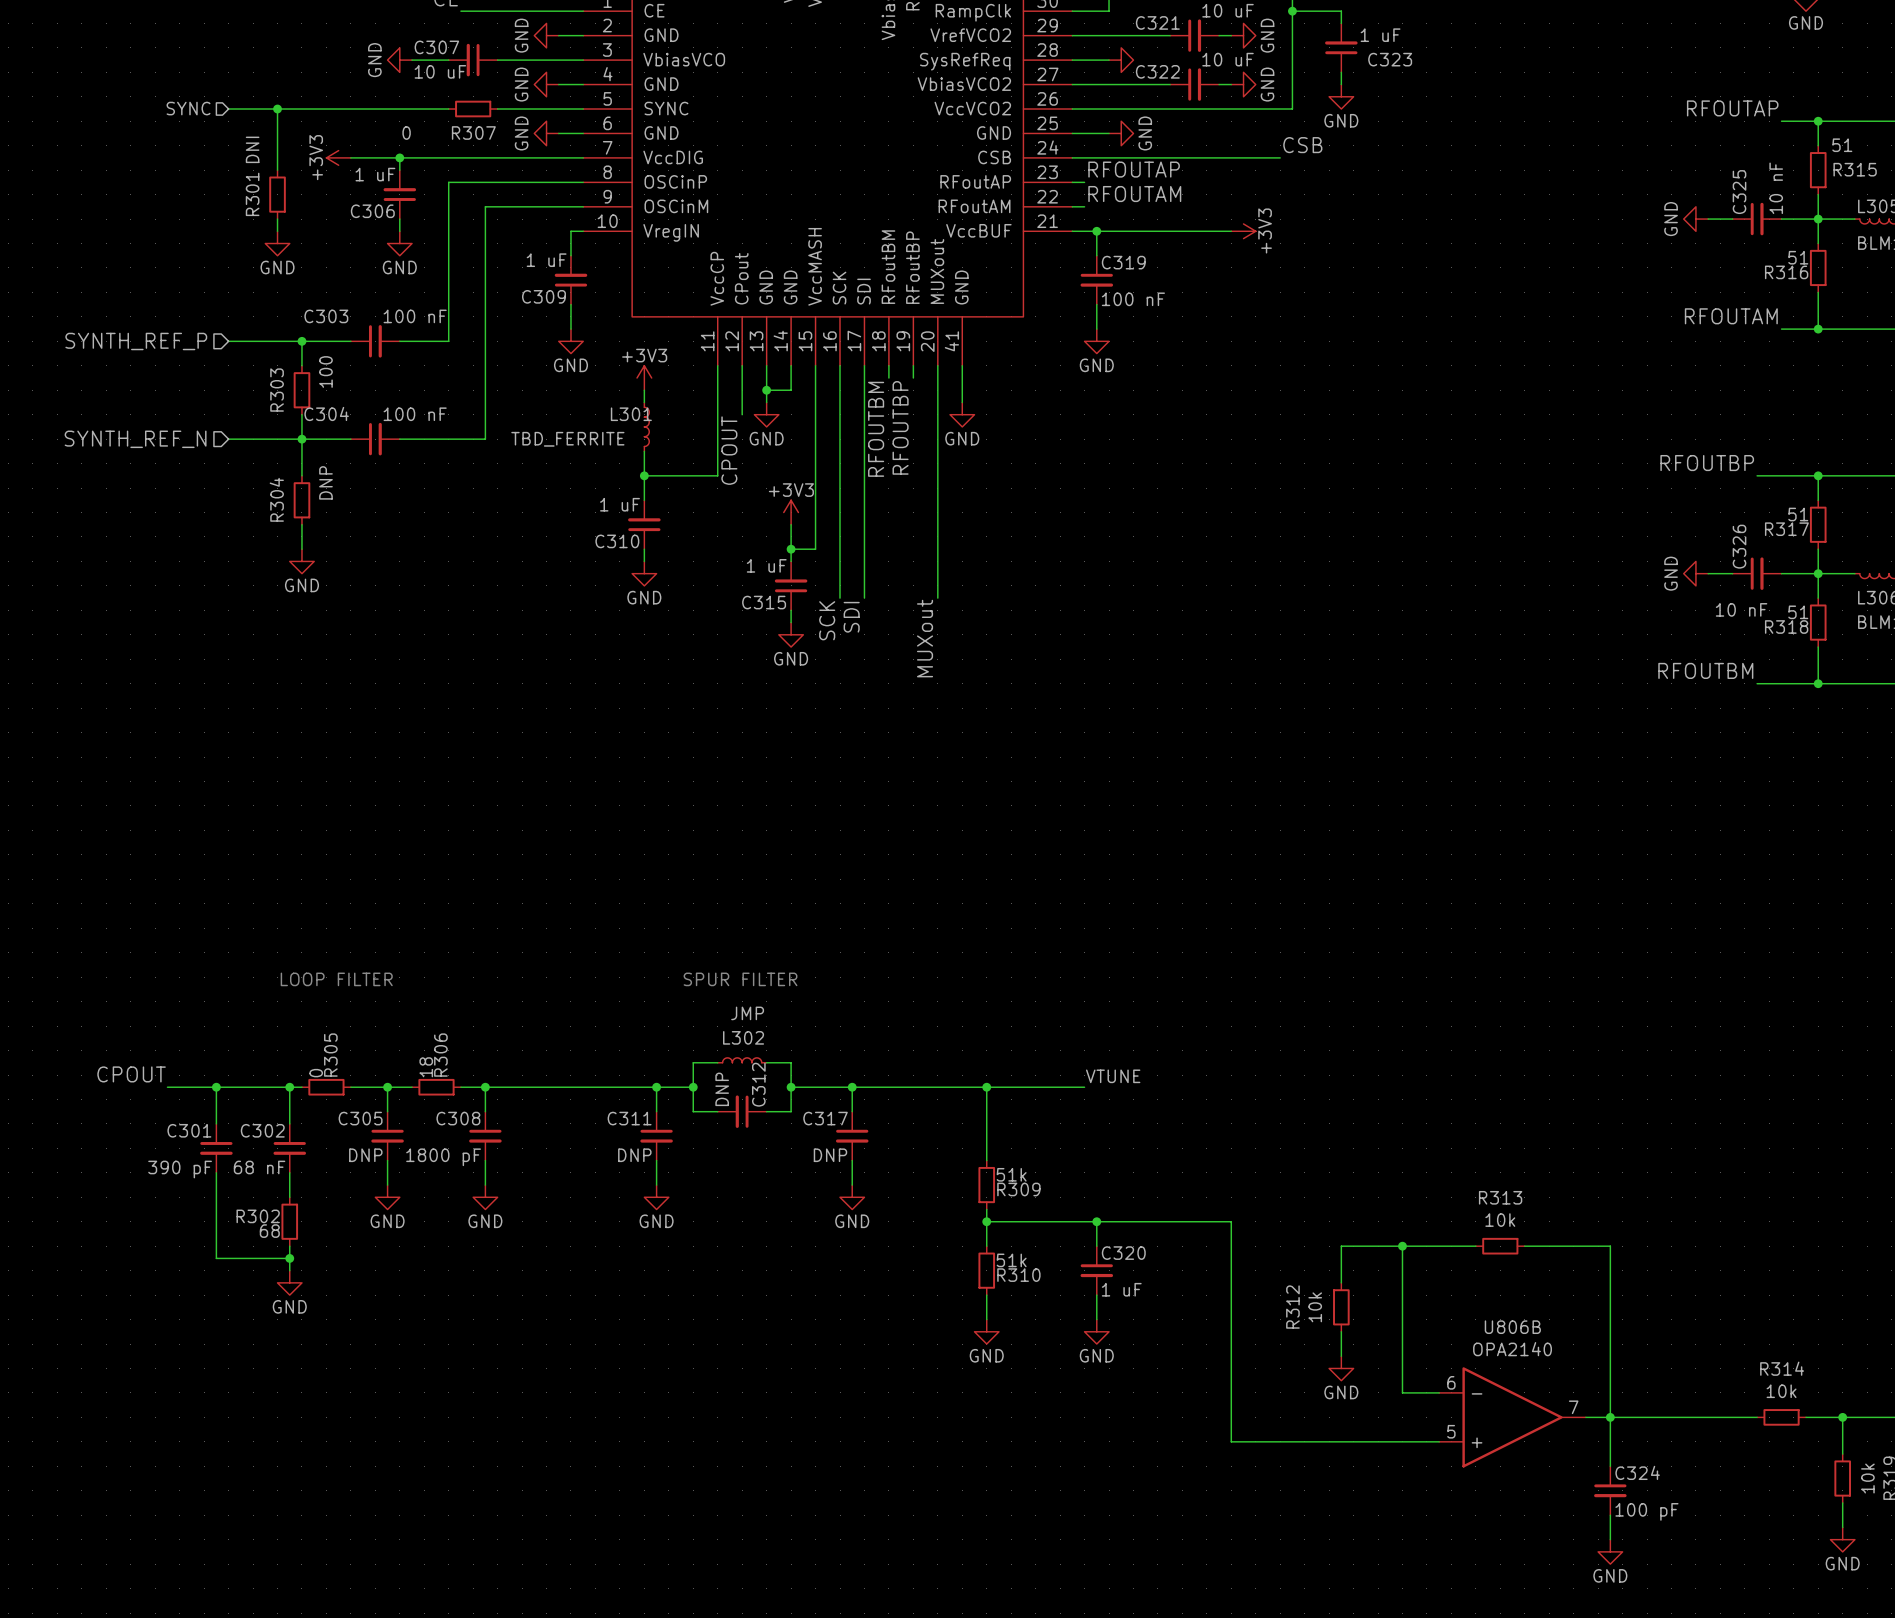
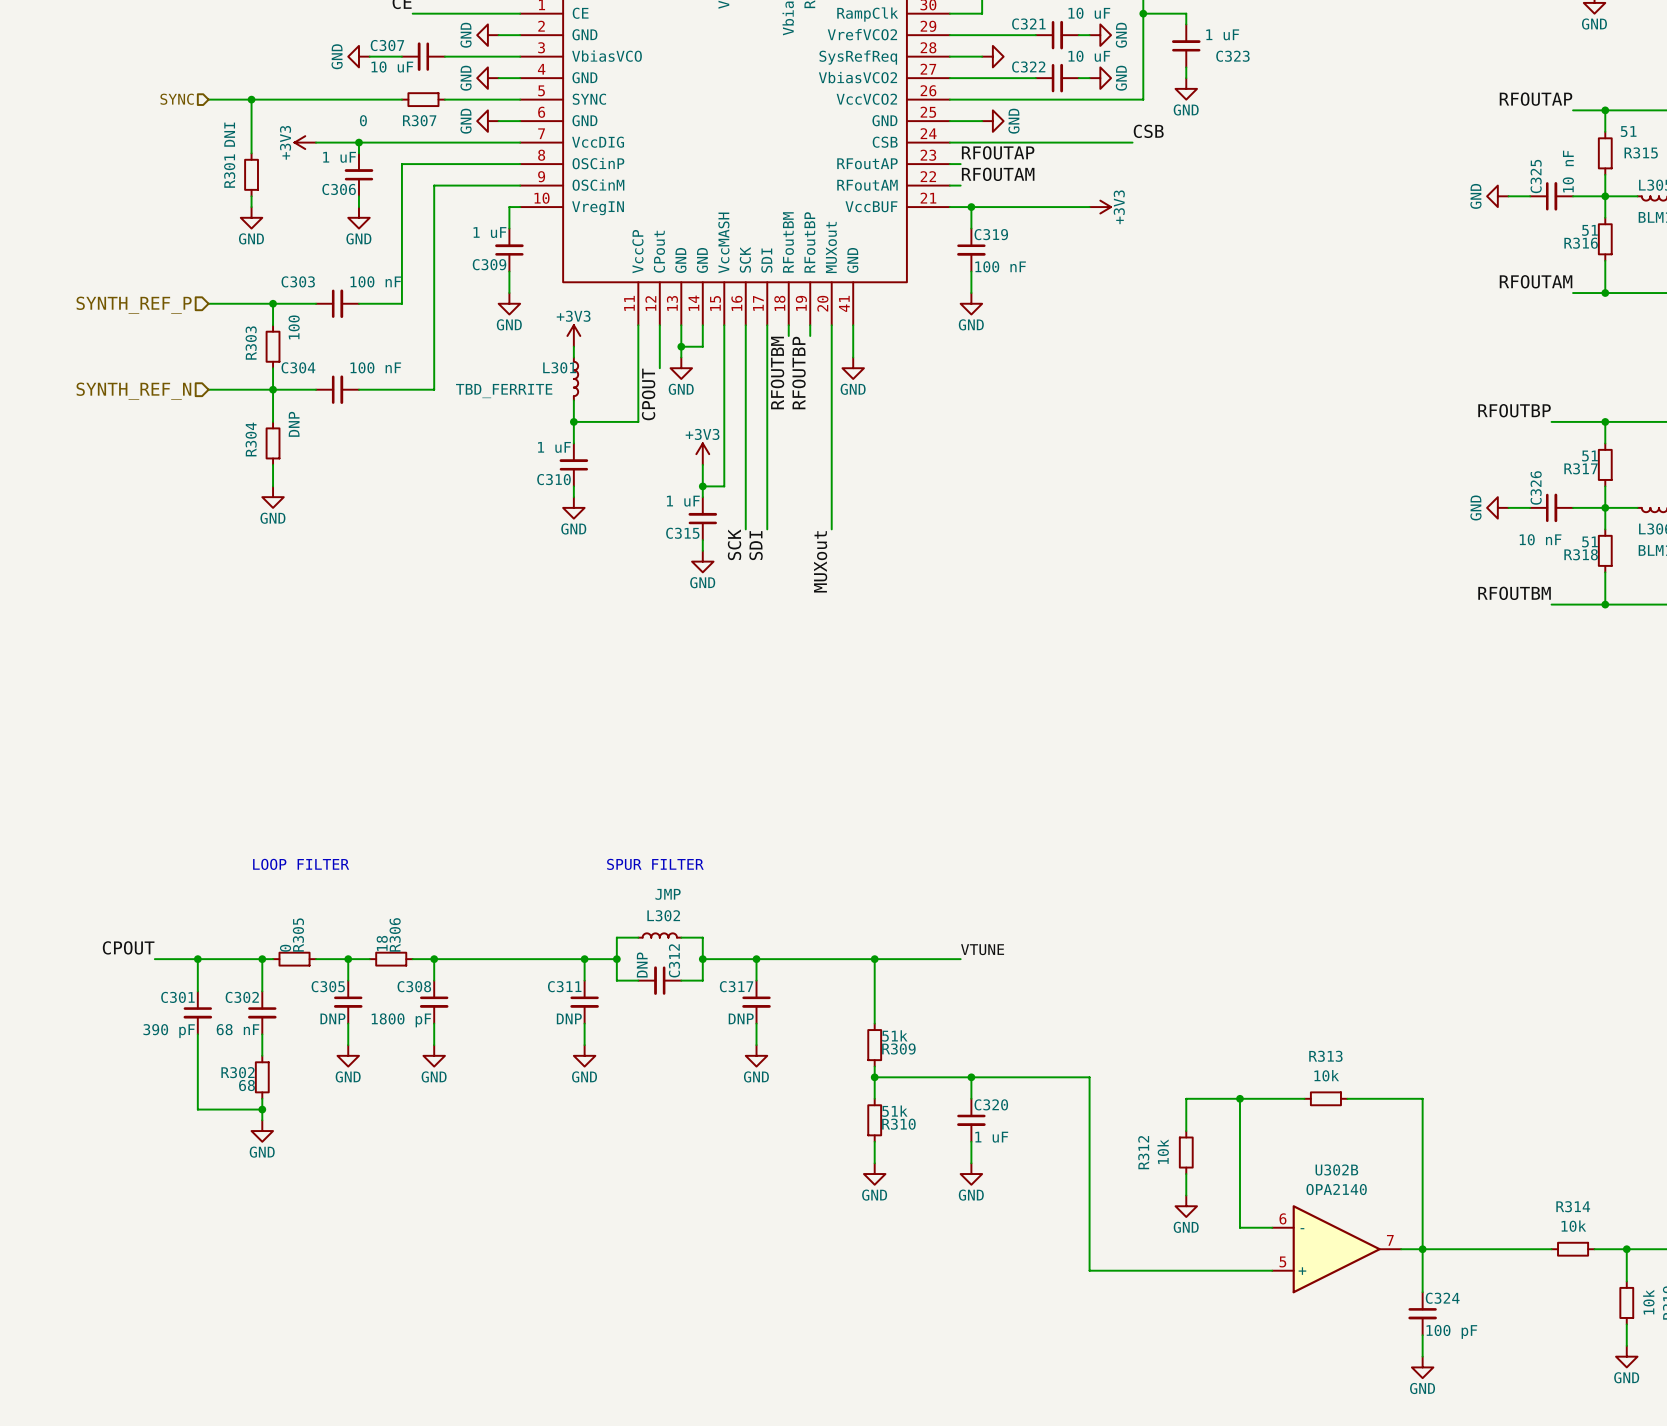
U806B name: U806B (1512, 1327) -> U302B (1336, 1169)

